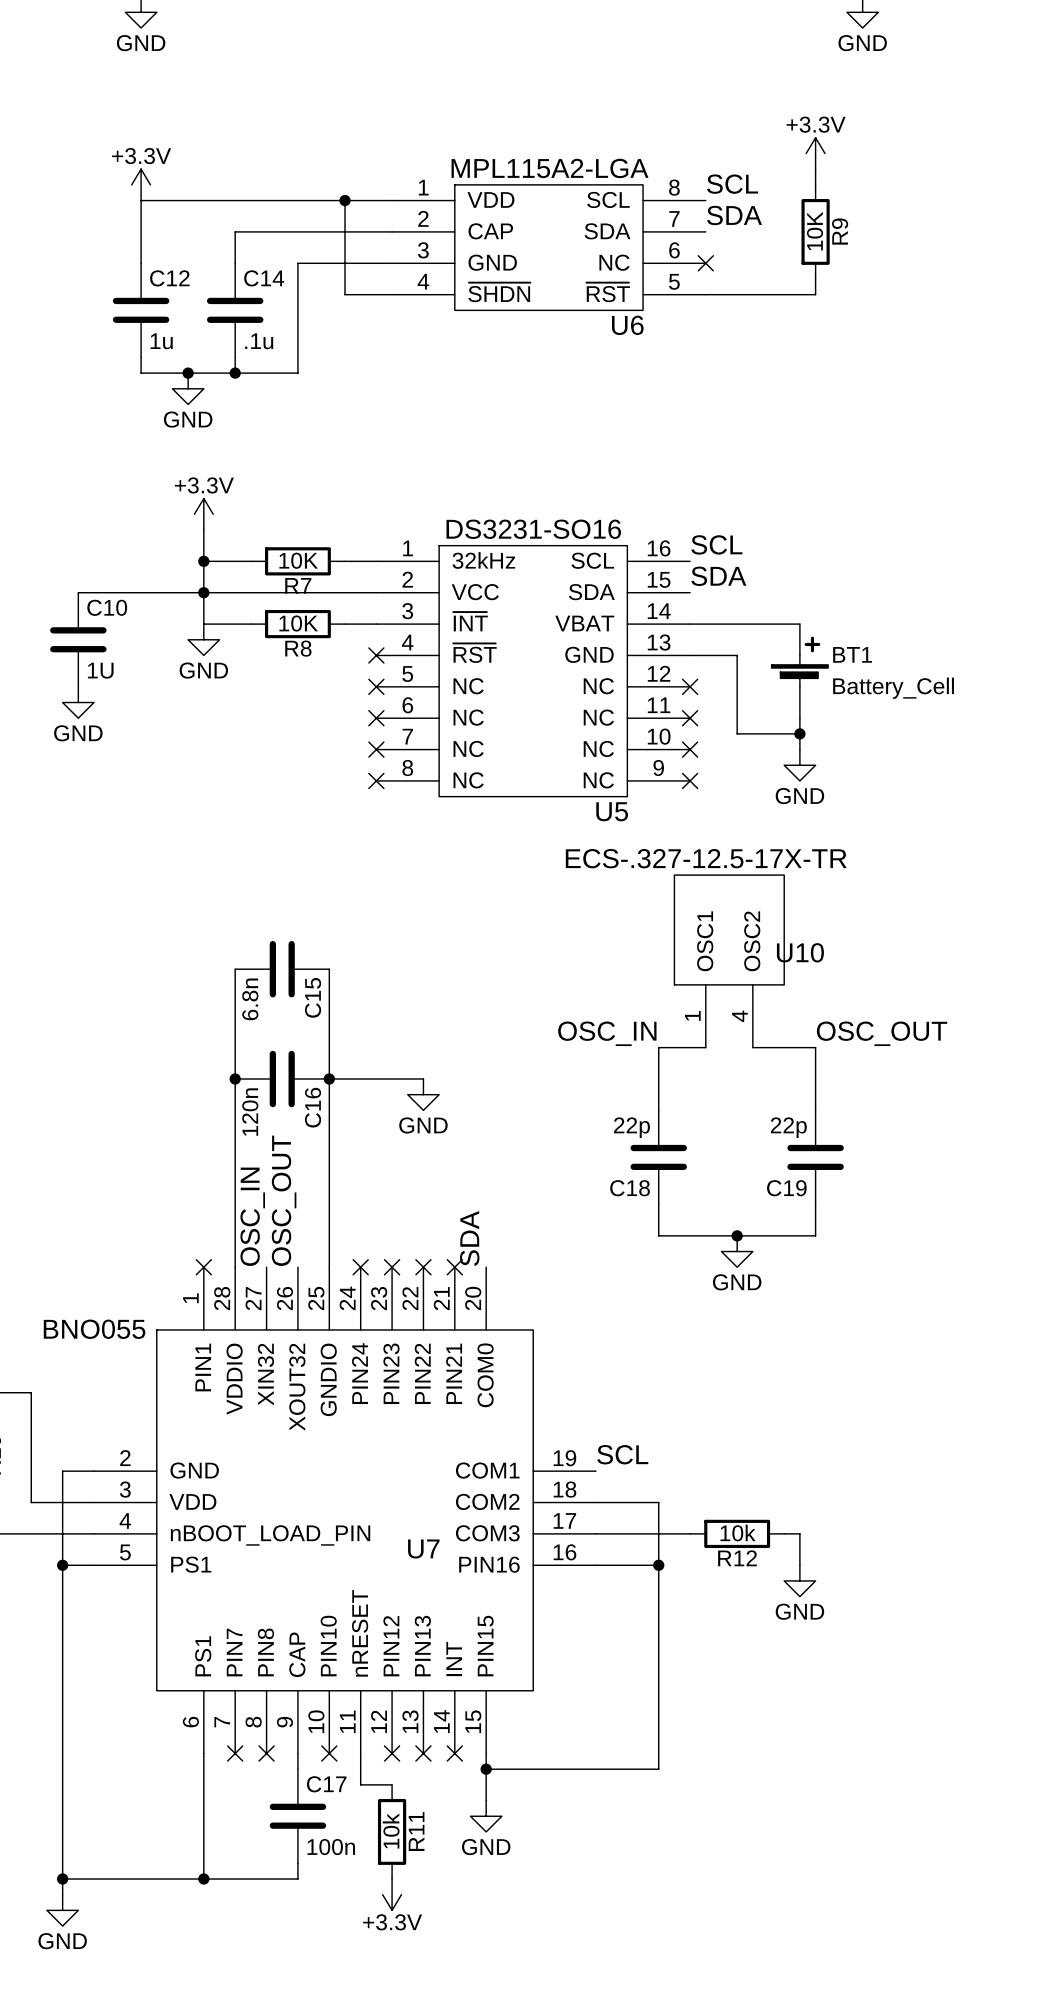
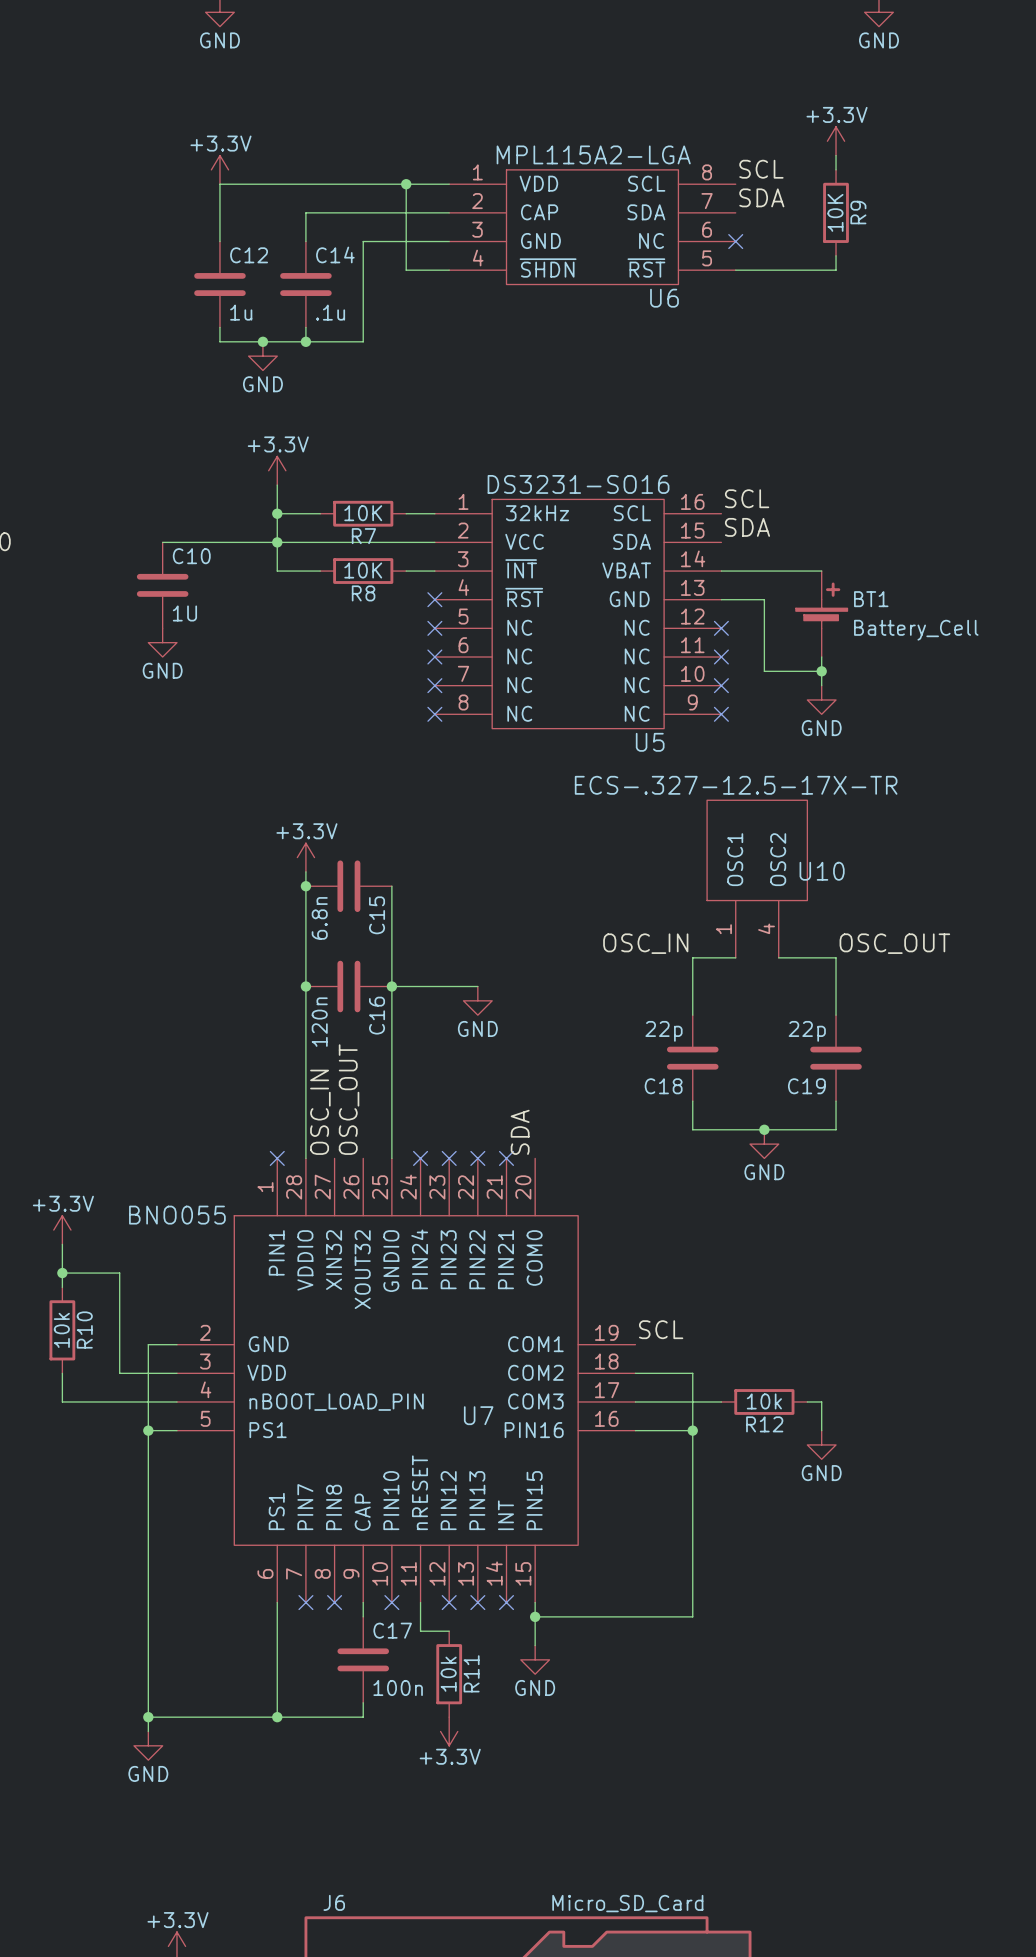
power symbol: GND (203, 639) -> none
power symbol: none -> +3.3V (305, 857)
wire: none -> (305, 871) (305, 886)
junction: none -> (305, 886)

